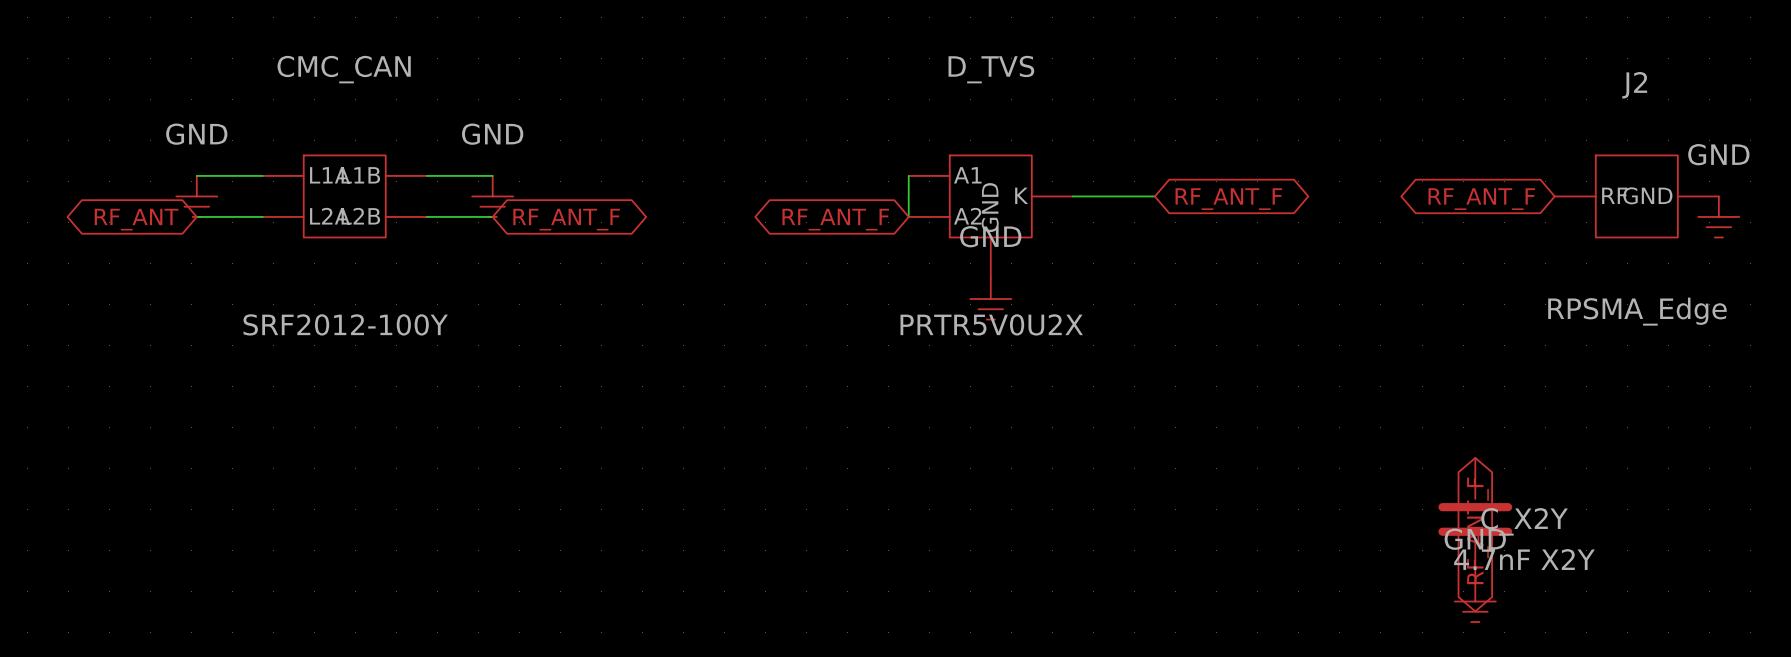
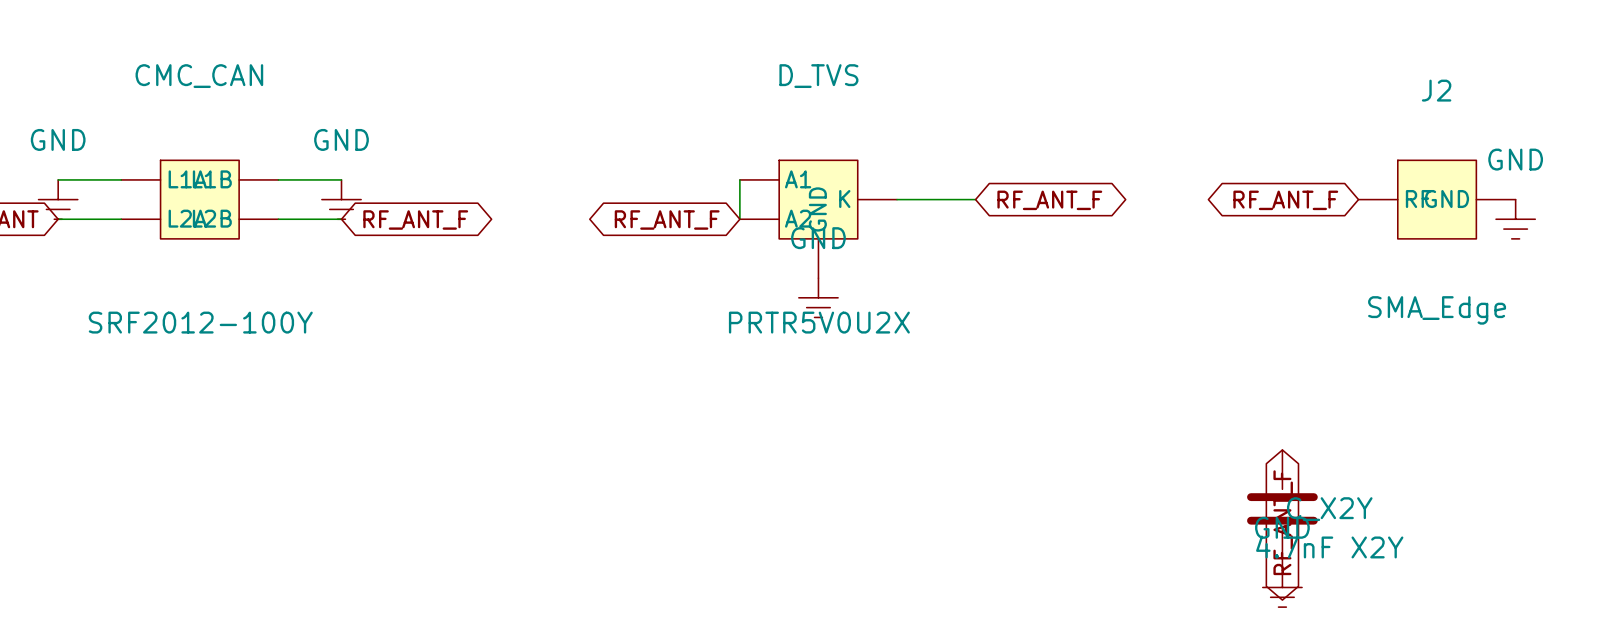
J2 value: RPSMA_Edge (1637, 311) -> SMA_Edge (1437, 310)

